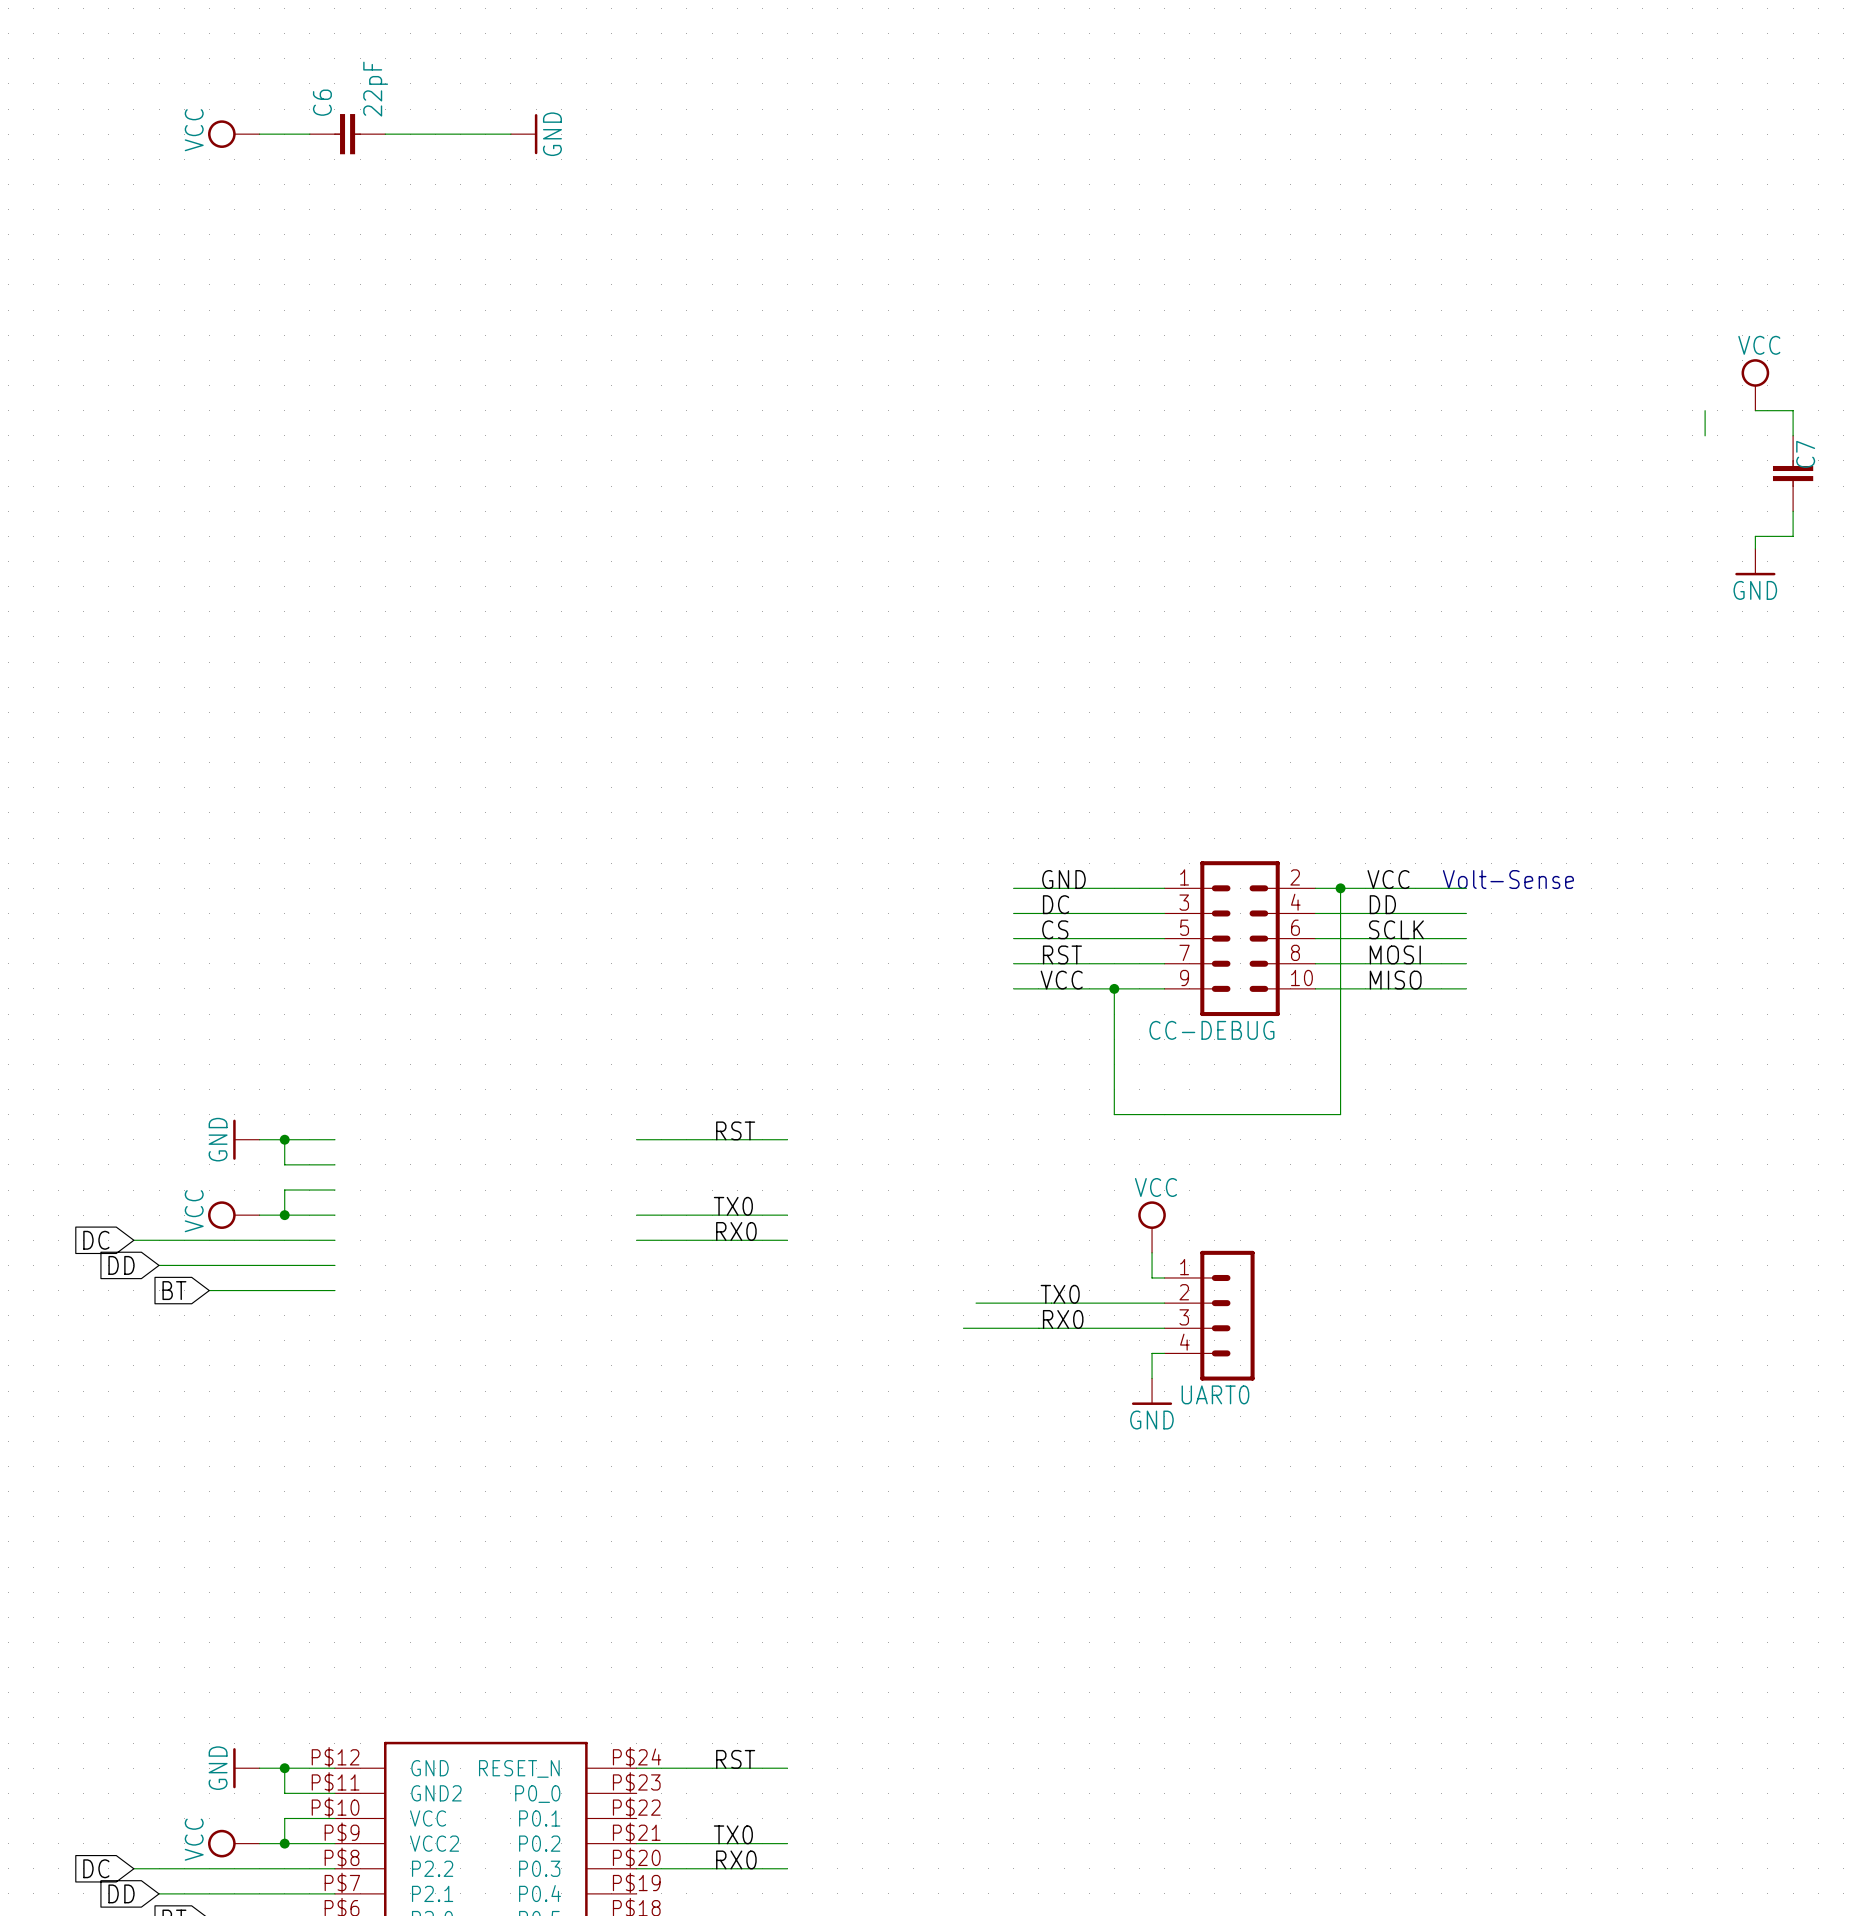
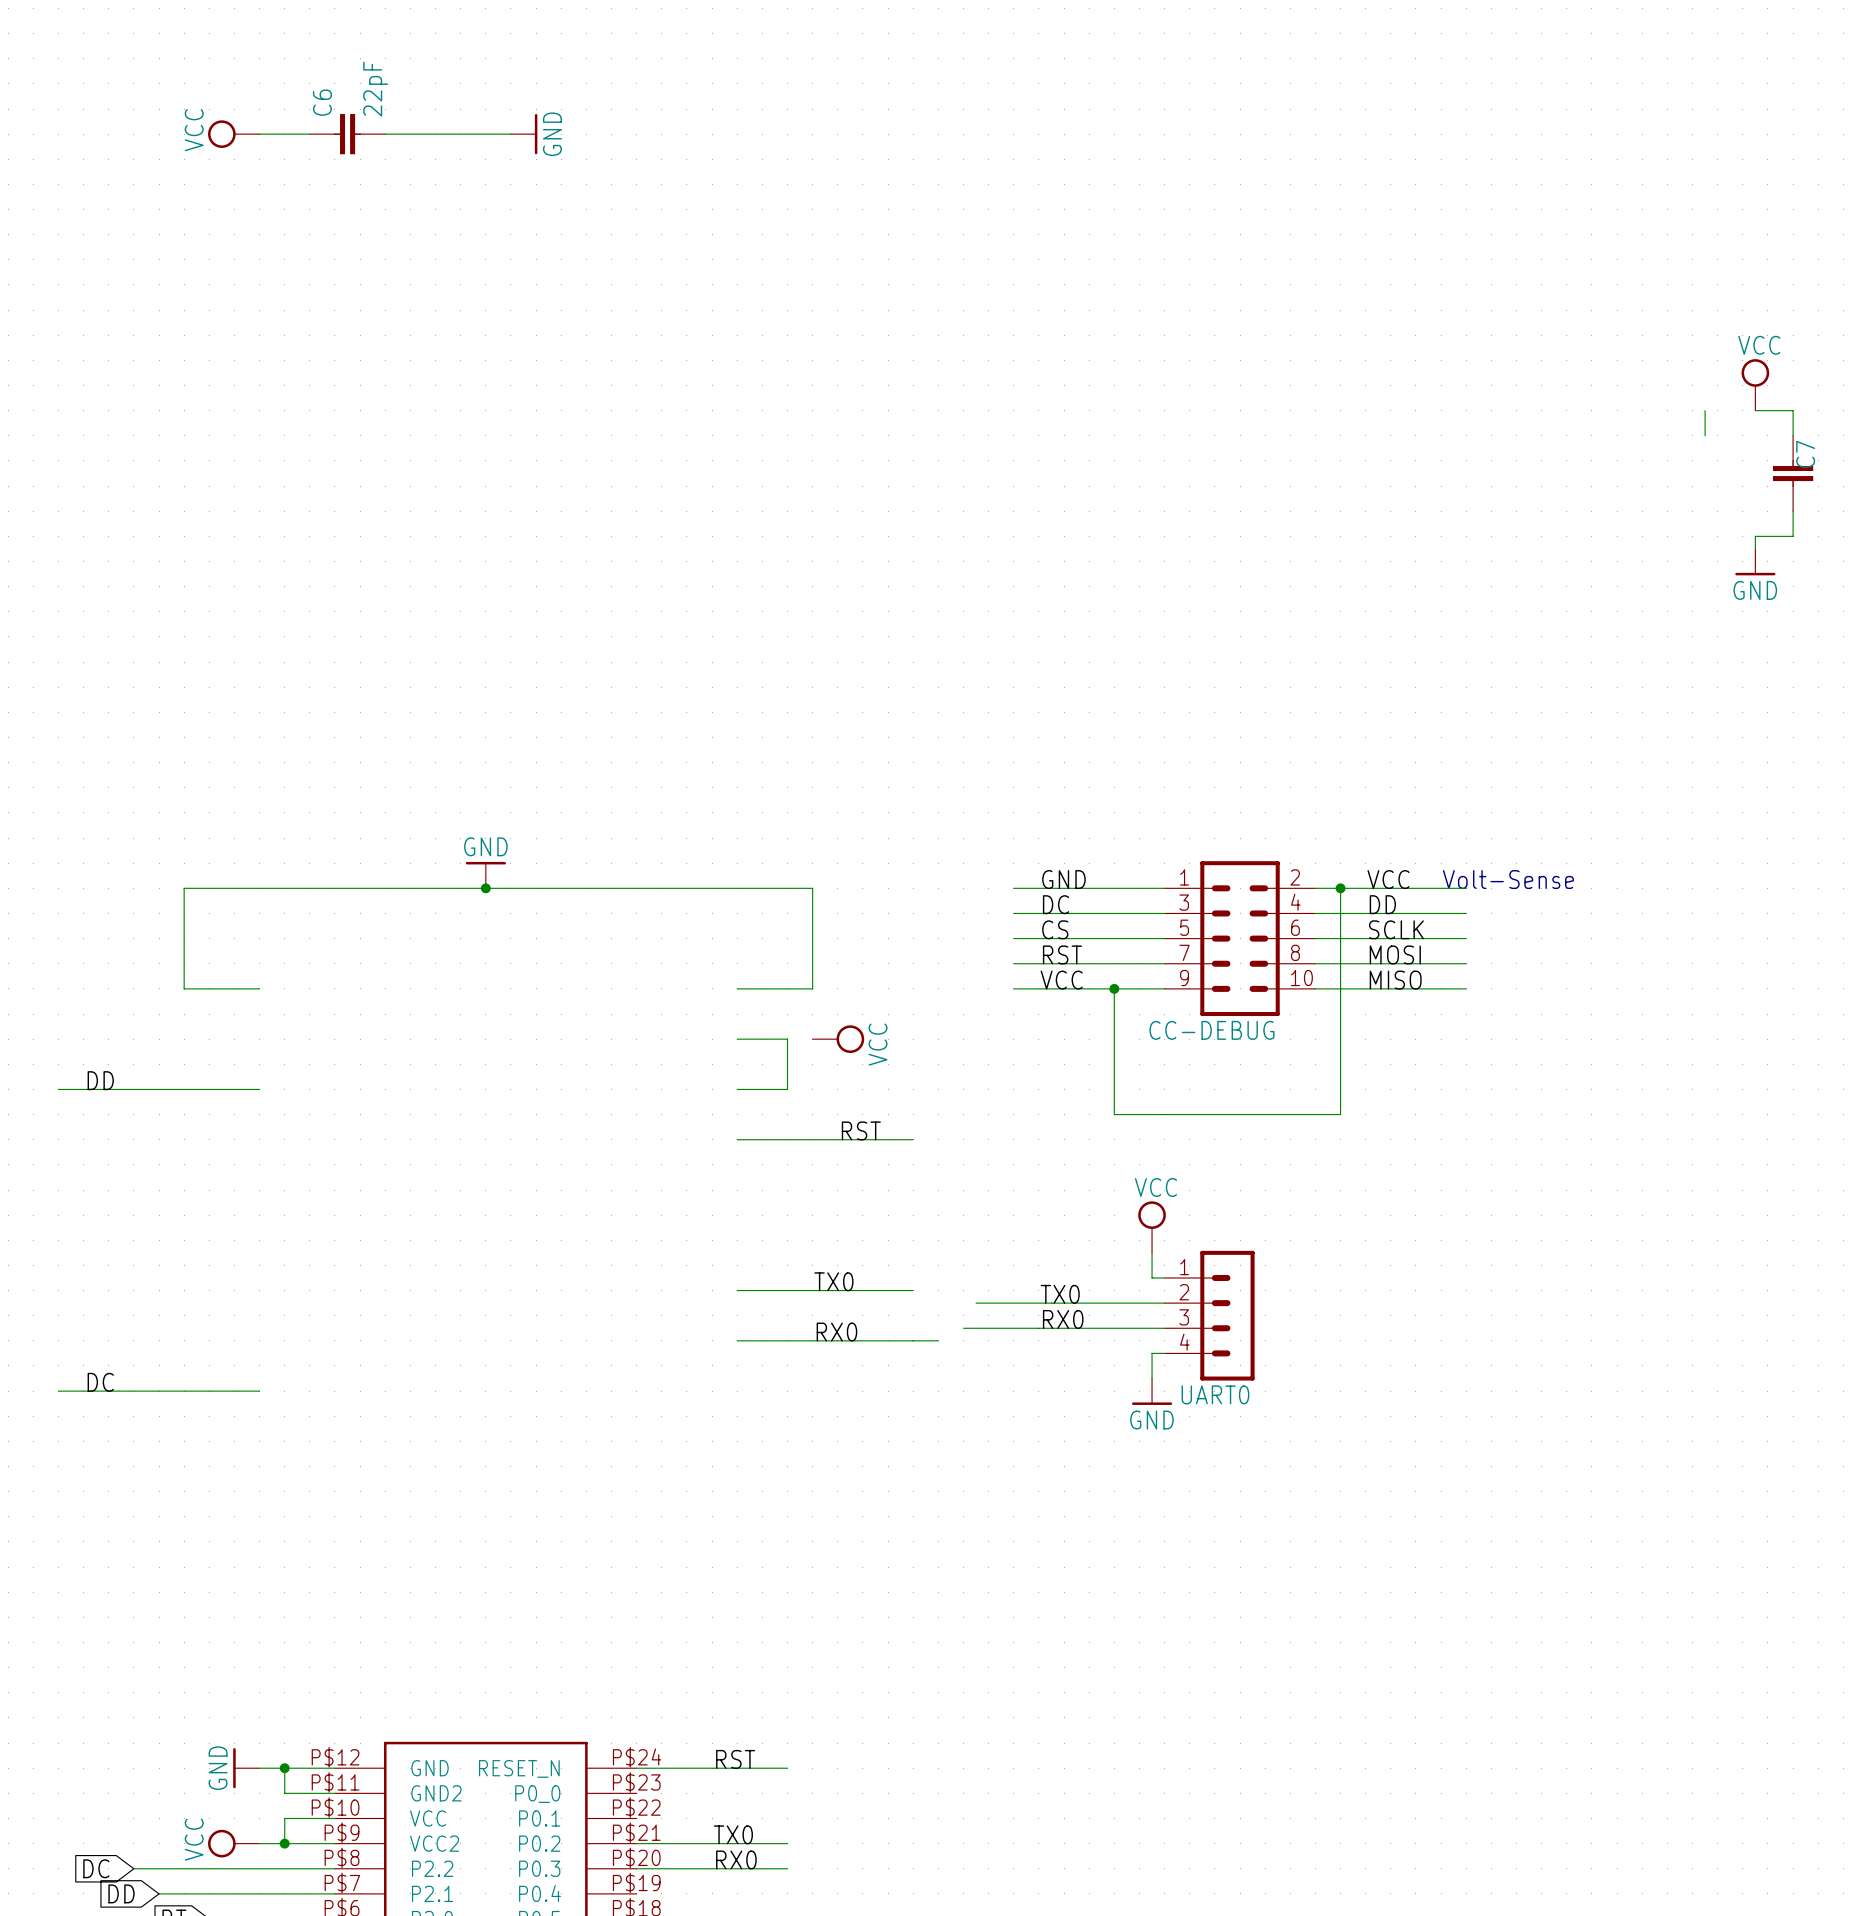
power symbol: none -> GND (485, 875)
junction: none -> (485, 888)
wire: none -> (259, 988) (184, 988) (184, 888) (812, 888) (812, 988) (737, 988)
wire: none -> (737, 1039) (787, 1039) (787, 1089) (737, 1089)
power symbol: none -> VCC (838, 1039)
label: none -> DD (100, 1080)
wire: none -> (58, 1089) (259, 1089)
label position: RST (735, 1130) -> RST (861, 1130)
power symbol: GND (246, 1139) -> none
wire: (259, 1139) (334, 1139) -> none
wire: (284, 1139) (284, 1164) (334, 1164) -> none
junction: (284, 1139) -> none
wire: (636, 1139) (737, 1139) -> none
wire: none -> (787, 1139) (913, 1139)
wire: (334, 1190) (284, 1190) (284, 1215) -> none
label position: TX0 (733, 1206) -> TX0 (833, 1281)
power symbol: VCC (233, 1215) -> none
wire: (259, 1215) (334, 1215) -> none
junction: (284, 1215) -> none
wire: (636, 1215) (787, 1215) -> none
label position: RX0 (736, 1231) -> RX0 (836, 1332)
global label: DC (96, 1240) -> none
wire: (133, 1240) (334, 1240) -> (58, 1391) (259, 1391)
wire: (636, 1240) (787, 1240) -> none
global label: DD (121, 1265) -> none
wire: (159, 1265) (334, 1265) -> none
global label: BT (174, 1290) -> none
wire: (209, 1290) (334, 1290) -> none
wire: none -> (737, 1290) (913, 1290)
wire: none -> (737, 1340) (938, 1340)
label: none -> DC (100, 1382)

